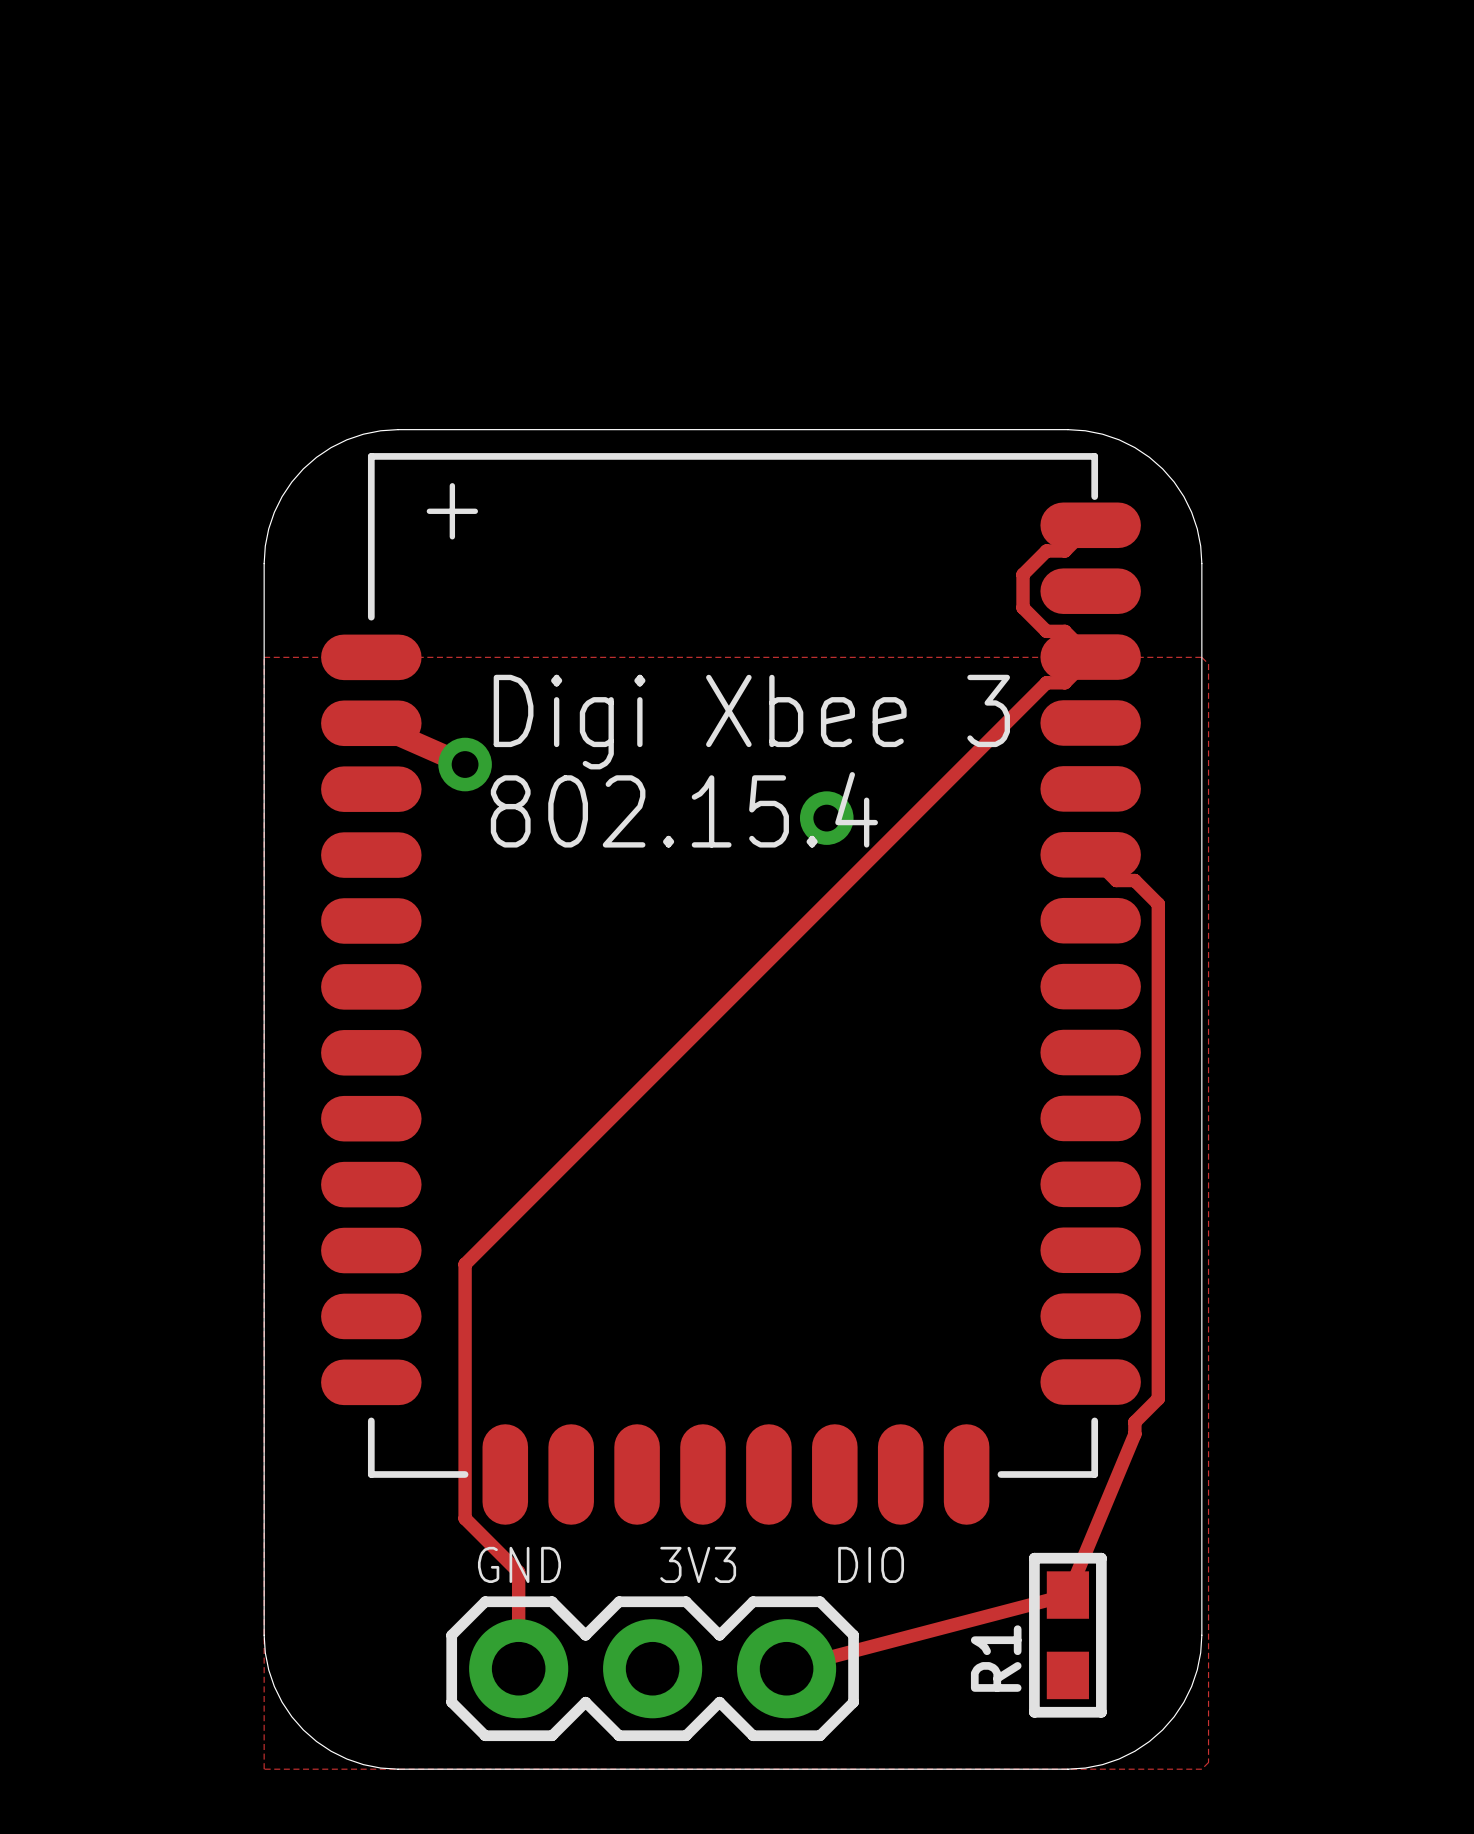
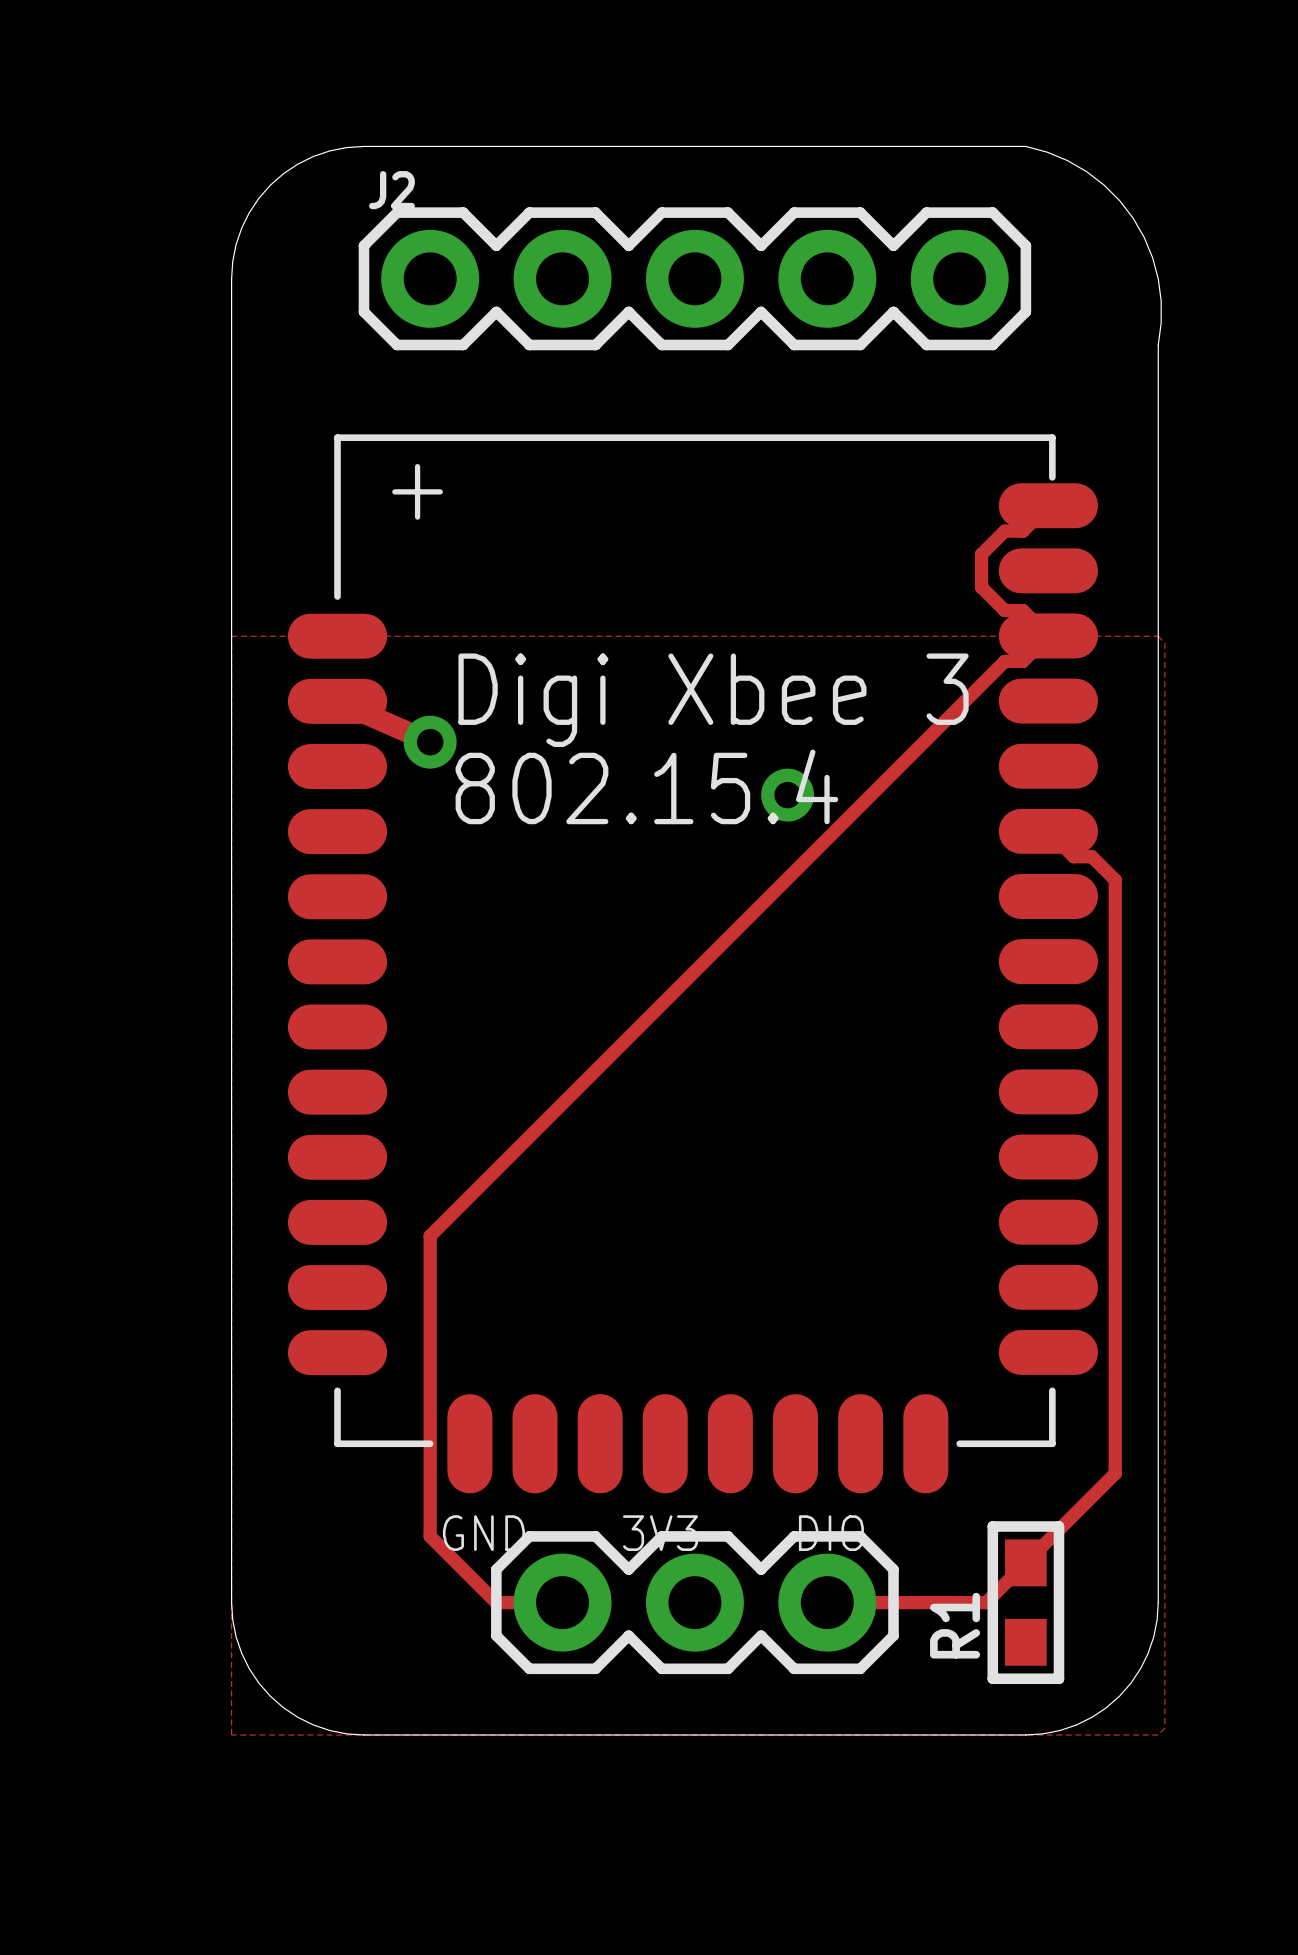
J2: none -> (694, 278)
board edge: (264, 563) (268, 528) (274, 512) (291, 482) (303, 468) (316, 457) (346, 439) (363, 434) (398, 429) (1085, 430) (1119, 439) (1149, 457) (1162, 468) (1174, 482) (1191, 512) (1197, 528) (1201, 563) -> (231, 543) (231, 278) (236, 244) (241, 228) (258, 198) (283, 173) (313, 156) (329, 150) (363, 146) (1025, 146) (1067, 160) (1104, 185) (1133, 218) (1144, 237) (1158, 279) (1161, 301) (1158, 345) (1158, 543)
track: (1158, 1398) (1134, 1422) (1134, 1434) (1067, 1595) (786, 1668) -> (1115, 1368) (1115, 1473) (986, 1602) (827, 1602)
track: (465, 1518) (518, 1572) (518, 1668) -> (430, 1487) (430, 1536) (496, 1602) (562, 1602)
part position: (652, 1668) -> (694, 1602)

